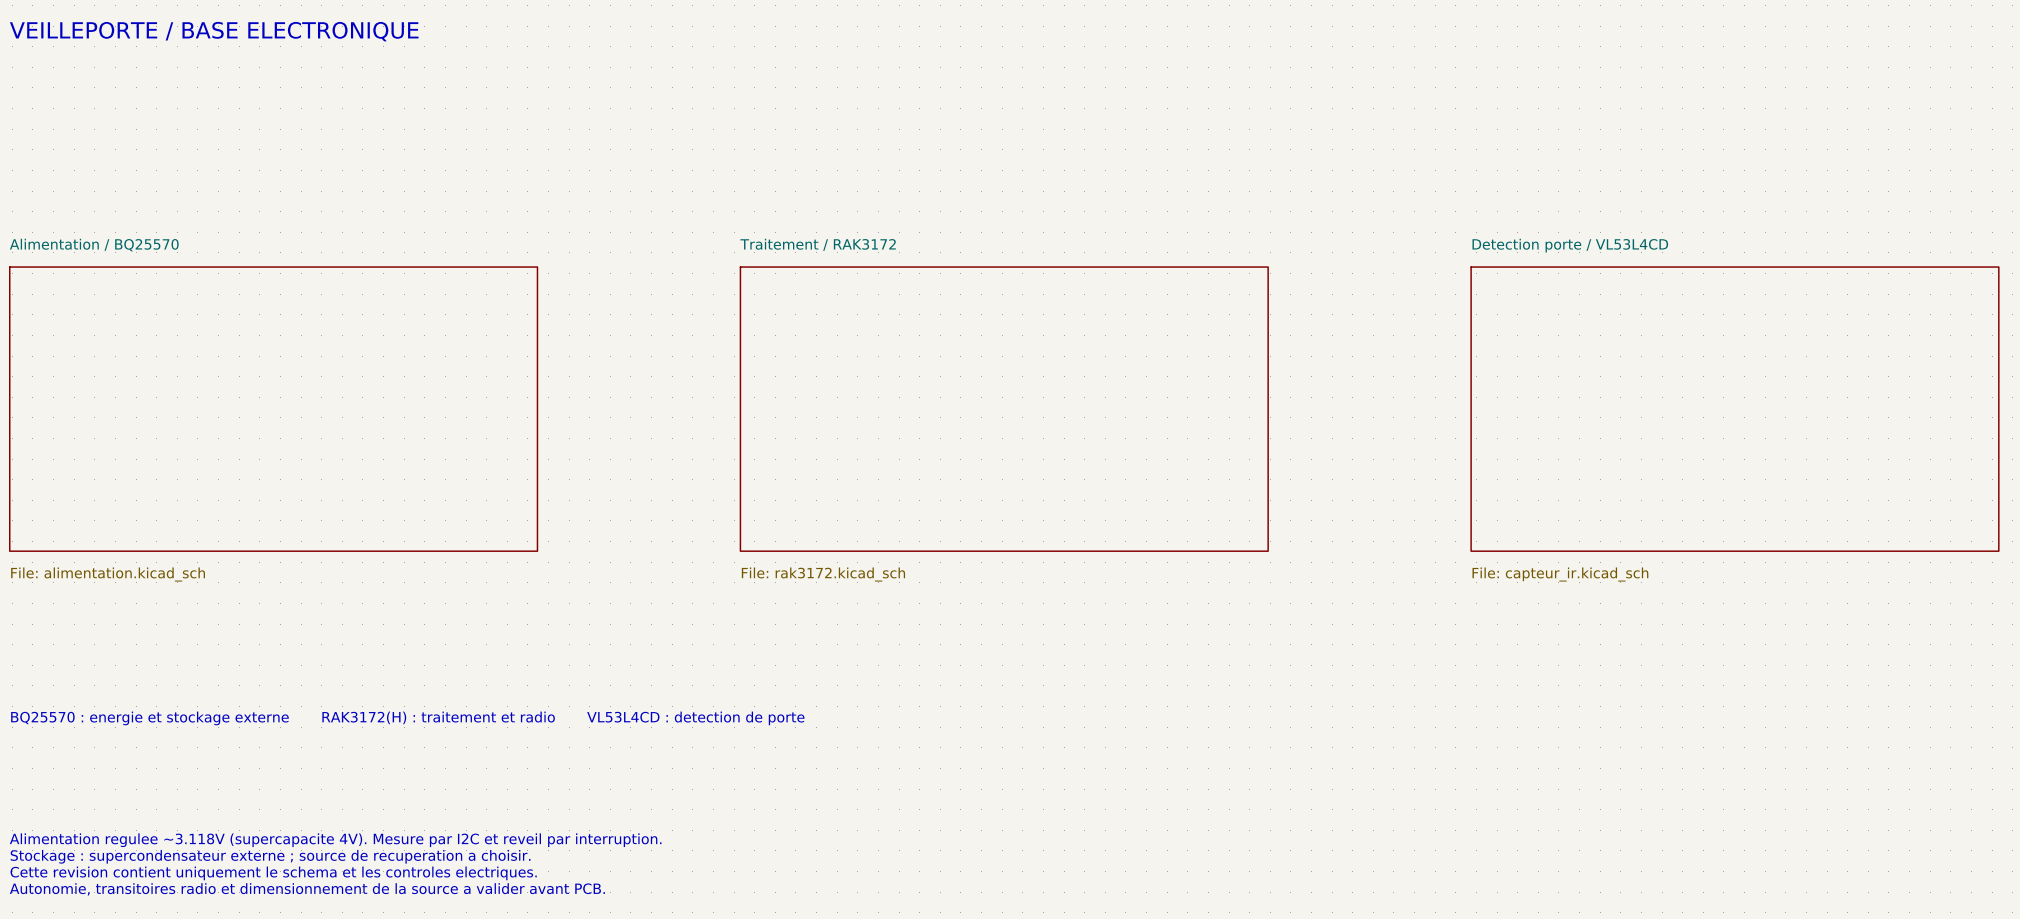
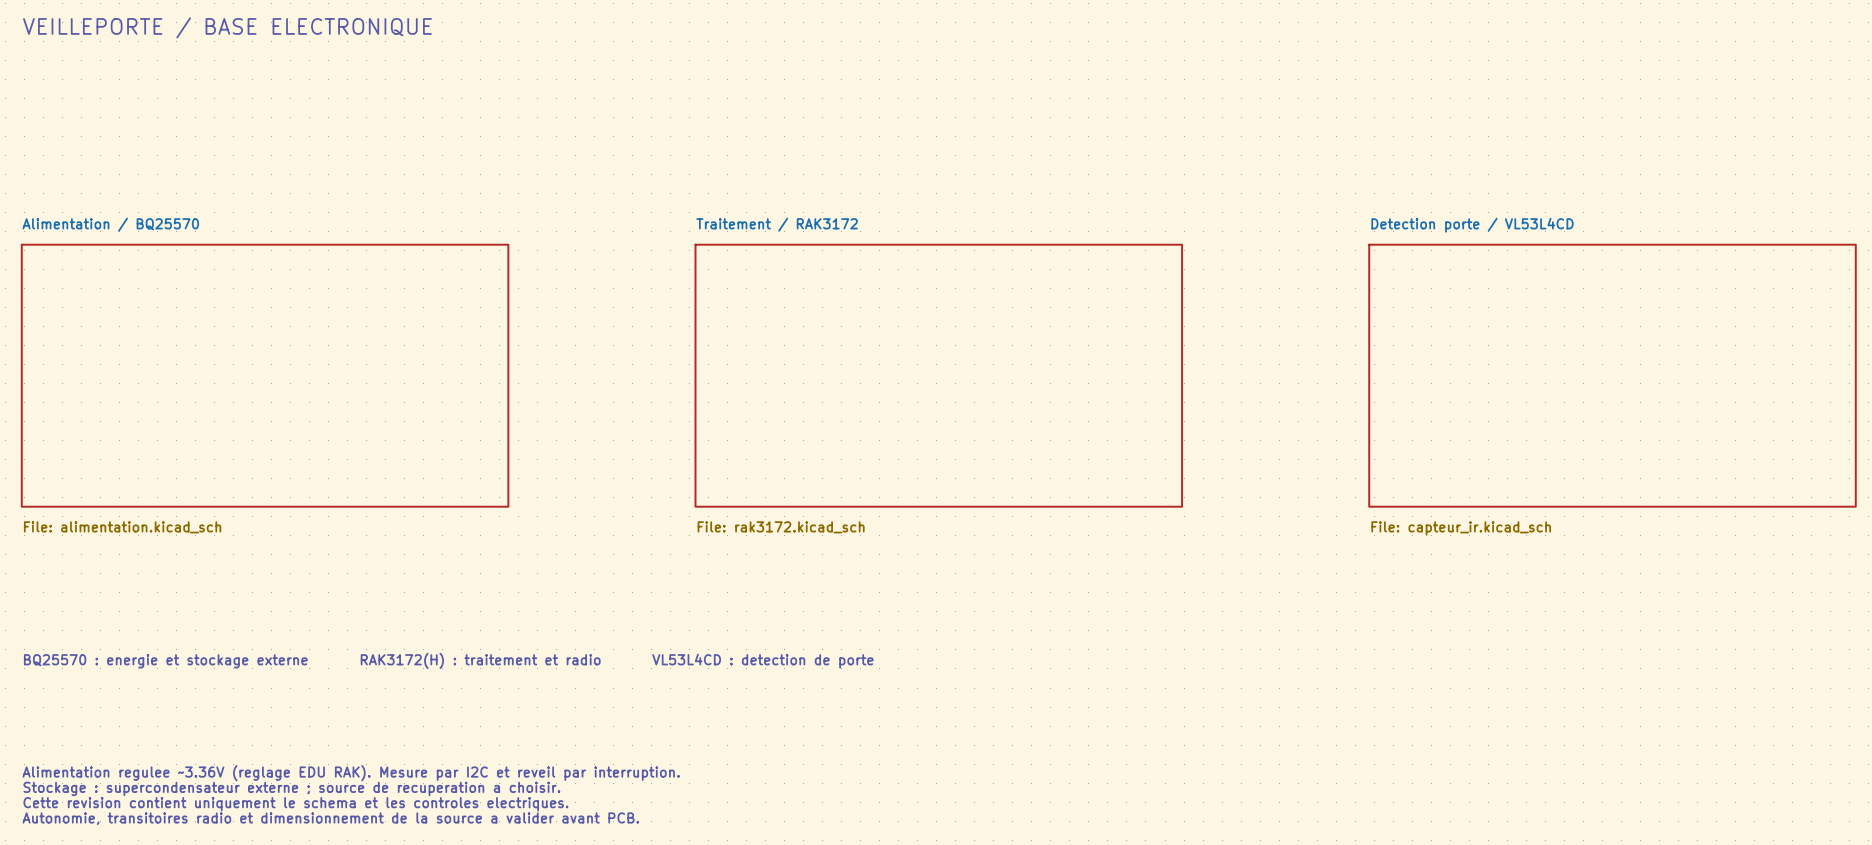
text: Alimentation regulee ~3.118V (supercapacite 4V). Mesure par I2C et reveil par interruption. (335, 840) -> Alimentation regulee ~3.36V (reglage EDU RAK). Mesure par I2C et reveil par interruption. (351, 773)

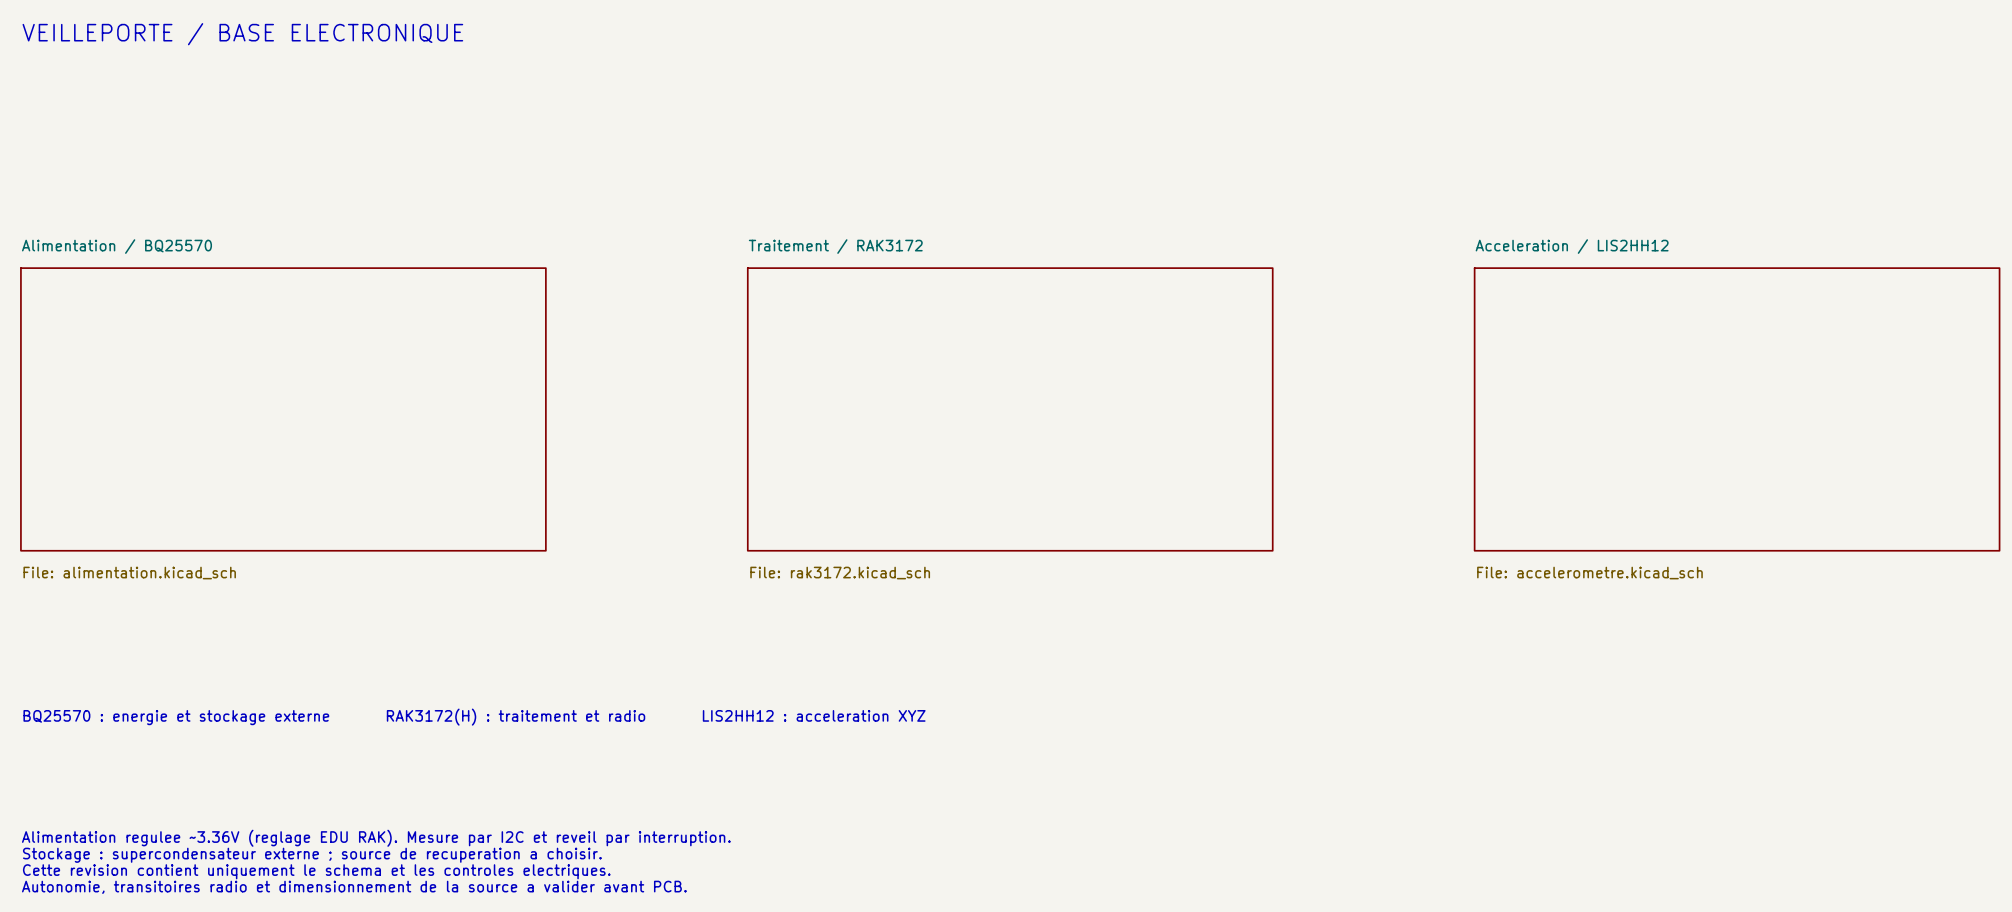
sheet Detection porte / VL53L4CD name: Detection porte / VL53L4CD (1472, 225) -> Acceleration / LIS2HH12 (1572, 246)
sheet Detection porte / VL53L4CD value: File: capteur_ir.kicad_sch (1461, 528) -> File: accelerometre.kicad_sch (1589, 573)
text: BQ25570 : energie et stockage externe RAK3172(H) : traitement et radio VL53L4CD : detection de porte (448, 660) -> BQ25570 : energie et stockage externe RAK3172(H) : traitement et radio LIS2HH12 : acceleration XYZ (474, 717)

